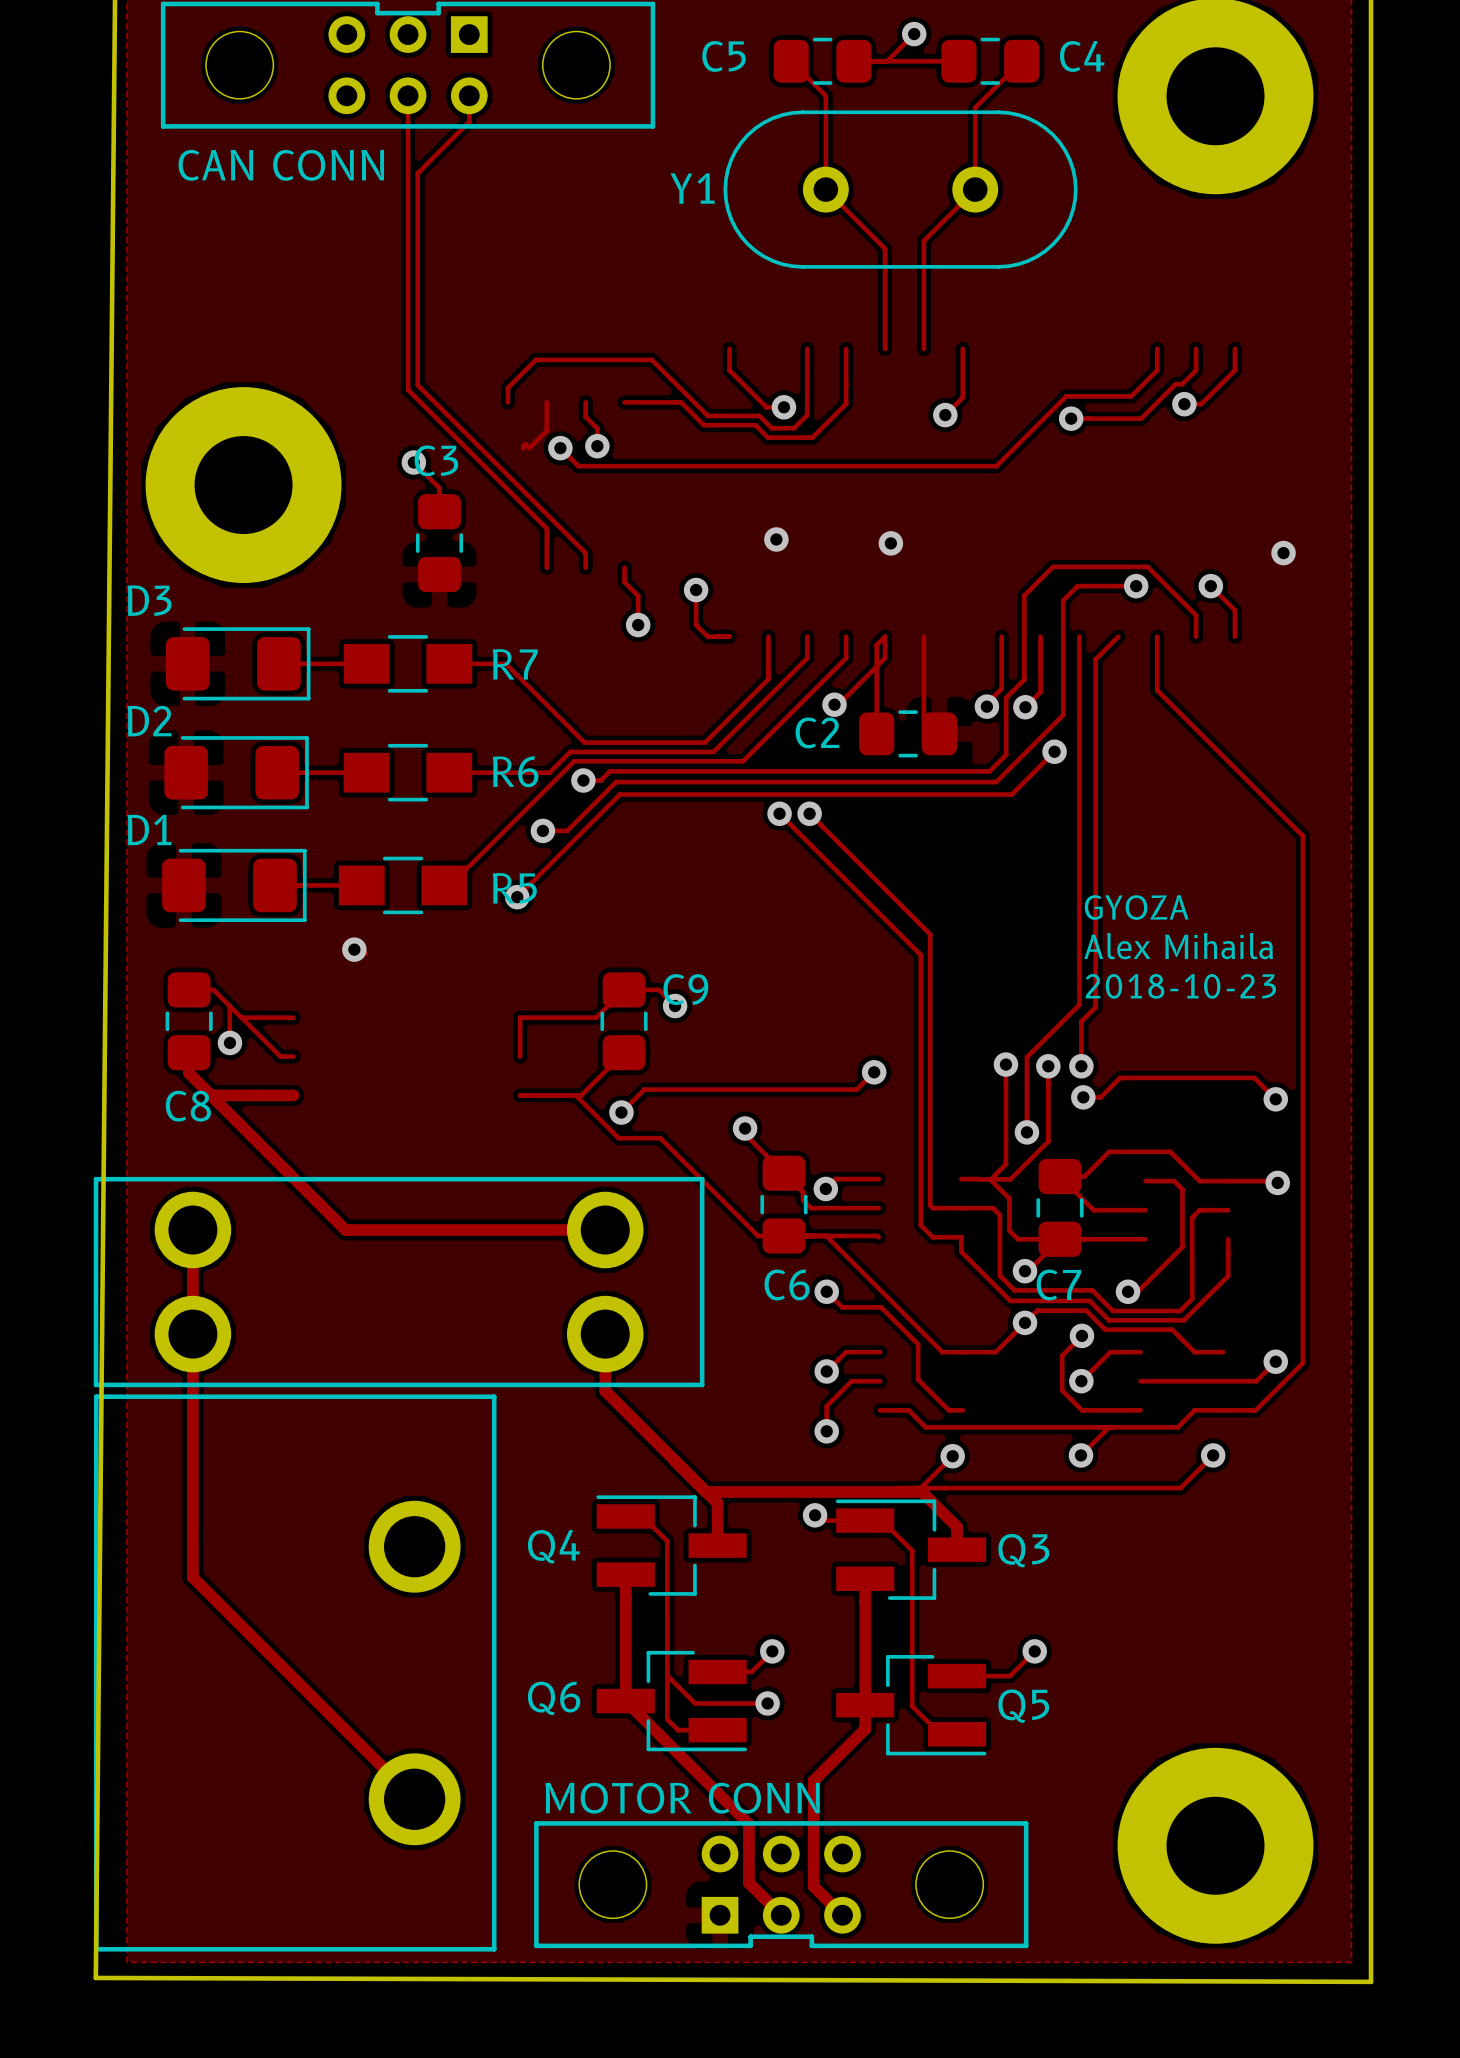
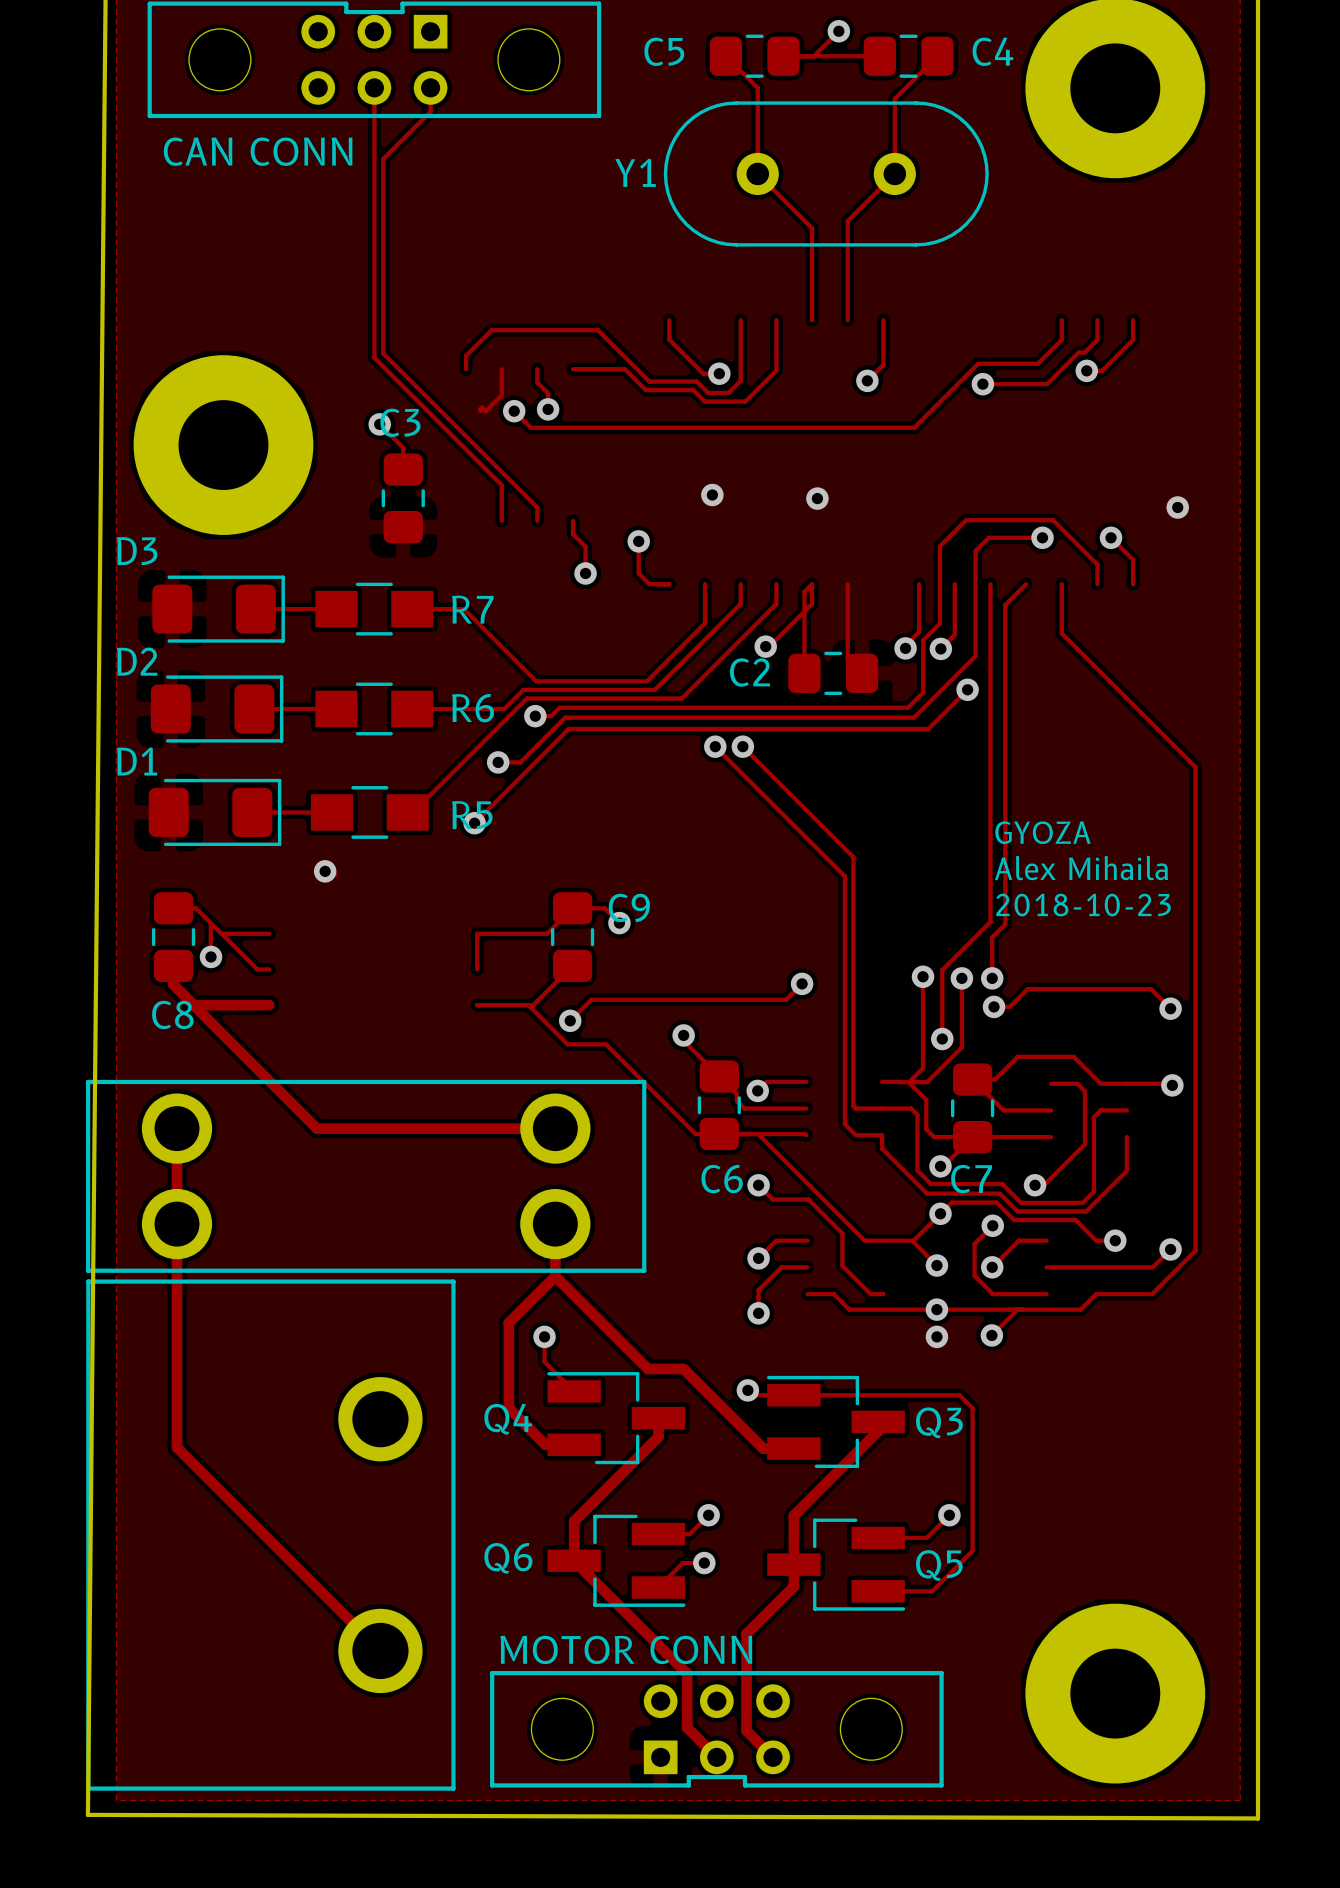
track: none -> (913, 1240) (936, 1265)
via: none -> (1115, 1240)
via: none -> (936, 1265)
track: none -> (555, 1276) (508, 1322) (508, 1408) (545, 1444) (574, 1444)
via: none -> (936, 1309)
track: (1213, 1455) (1180, 1488) (896, 1488) -> none
via: (1213, 1455) -> none
track: (952, 1456) (920, 1488) -> none
via: (952, 1456) -> none
via: none -> (544, 1336)
via: none -> (936, 1336)
track: (706, 1491) (717, 1503) (717, 1545) -> none
track: (745, 1491) (921, 1491) (957, 1527) (957, 1549) -> (683, 1368) (763, 1448) (793, 1448)
track: (625, 1516) (642, 1516) (667, 1541) (667, 1719) (678, 1730) (717, 1730) -> (574, 1391) (544, 1361) (544, 1336)
track: (882, 1520) (912, 1550) (912, 1706) (940, 1734) -> (809, 1395) (959, 1395) (972, 1408) (972, 1550) (932, 1591) (878, 1591)
track: (625, 1574) (625, 1657) -> (658, 1418) (658, 1437) (574, 1521)
track: (865, 1578) (865, 1651) -> (878, 1421) (878, 1431) (793, 1515)
track: (667, 1675) (695, 1703) (744, 1703) -> (658, 1587) (682, 1563)

